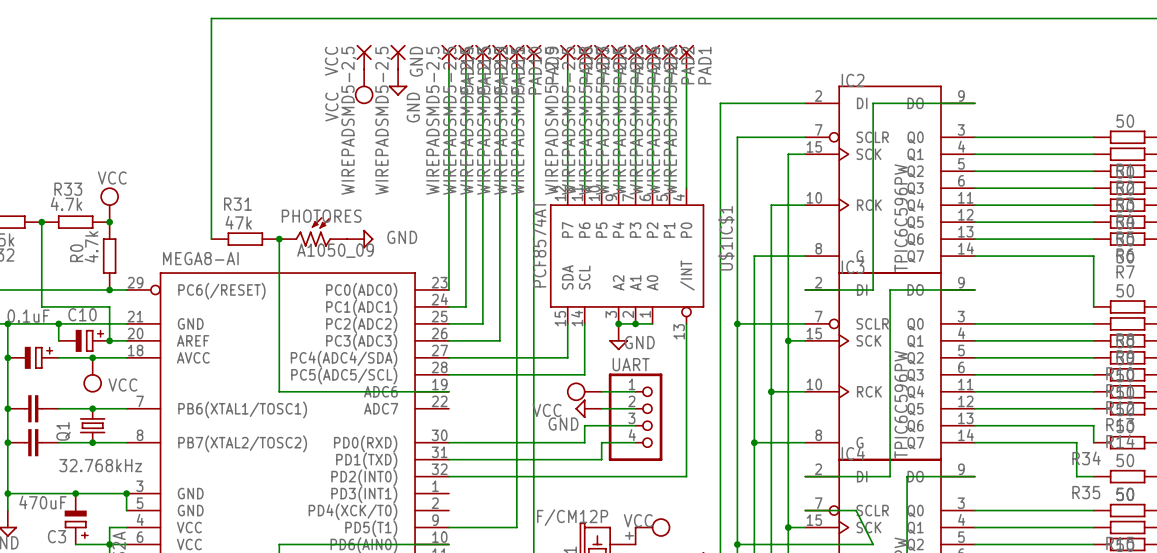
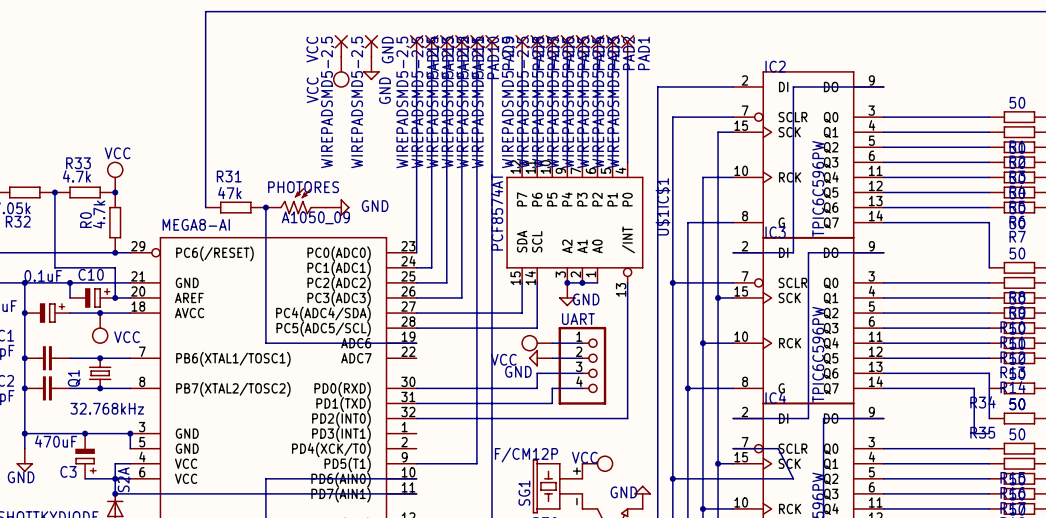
wire: none -> (989, 388) (989, 418)
wire: (1076, 476) (1093, 476) -> (974, 418) (974, 433) (989, 433)
R35 value position: 50 (1125, 494) -> 50 (1017, 404)

